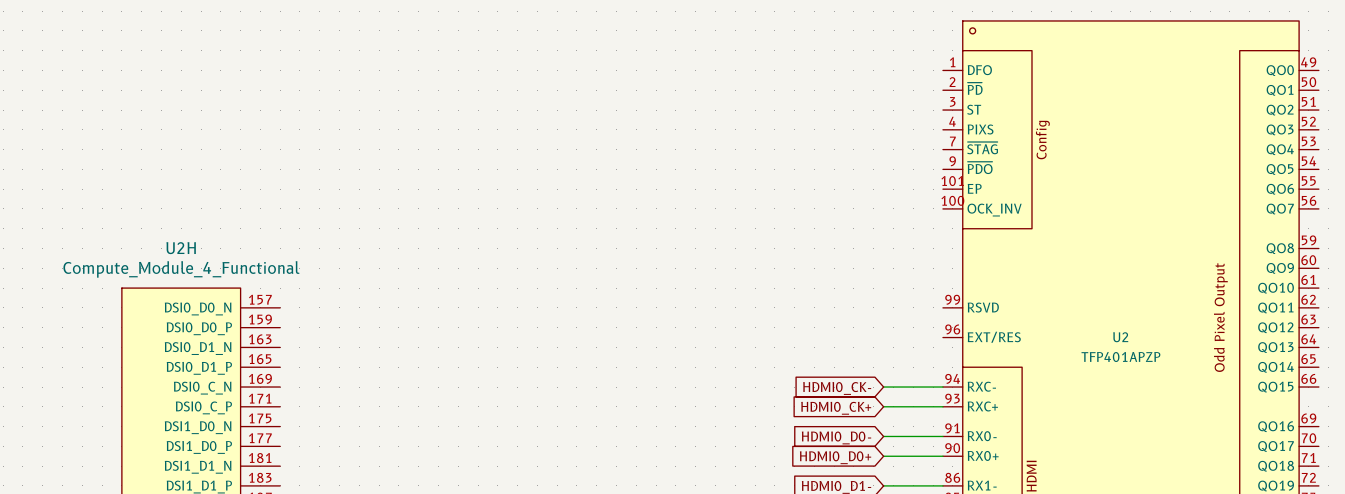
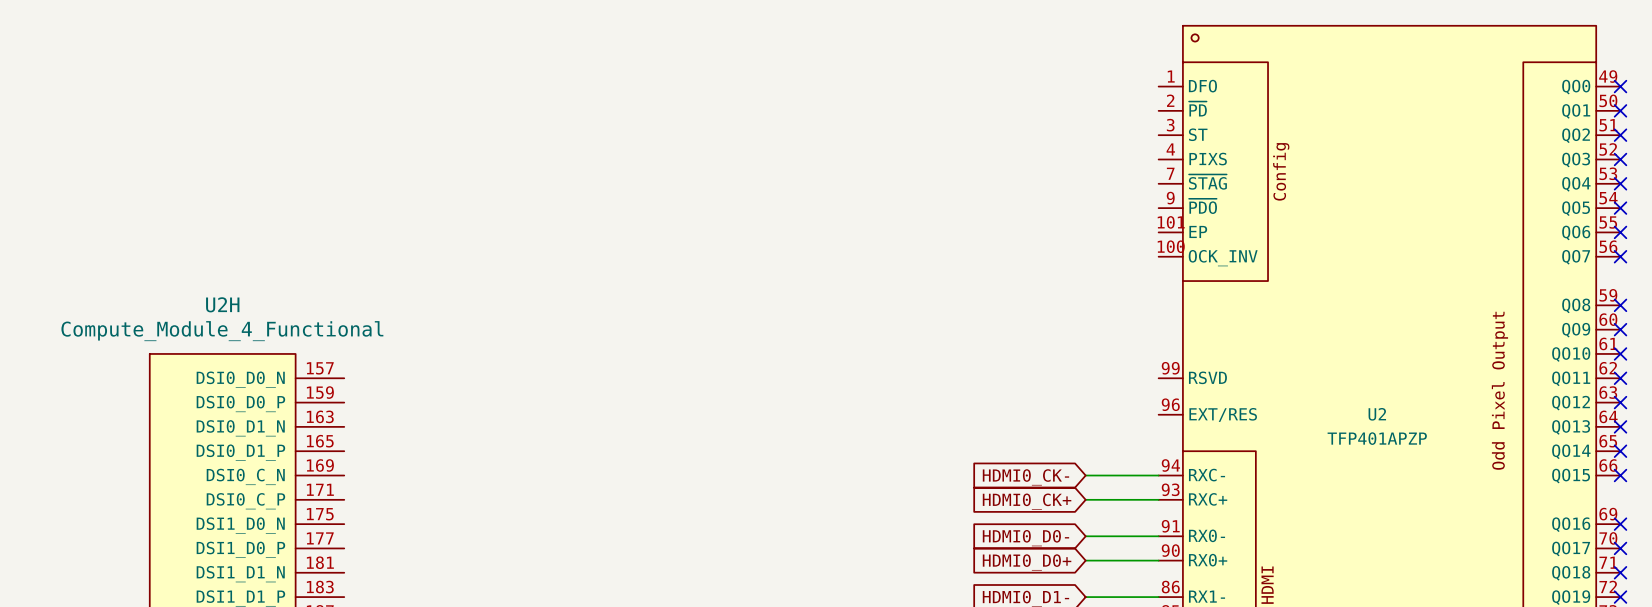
no-connect mark: none -> (1620, 86)
no-connect mark: none -> (1620, 110)
no-connect mark: none -> (1620, 135)
no-connect mark: none -> (1620, 159)
no-connect mark: none -> (1620, 183)
no-connect mark: none -> (1620, 208)
no-connect mark: none -> (1620, 232)
no-connect mark: none -> (1620, 256)
no-connect mark: none -> (1620, 305)
no-connect mark: none -> (1620, 329)
no-connect mark: none -> (1620, 353)
no-connect mark: none -> (1620, 378)
no-connect mark: none -> (1620, 402)
no-connect mark: none -> (1620, 426)
no-connect mark: none -> (1620, 451)
no-connect mark: none -> (1620, 475)
no-connect mark: none -> (1620, 524)
no-connect mark: none -> (1620, 548)
no-connect mark: none -> (1620, 572)
no-connect mark: none -> (1620, 597)

